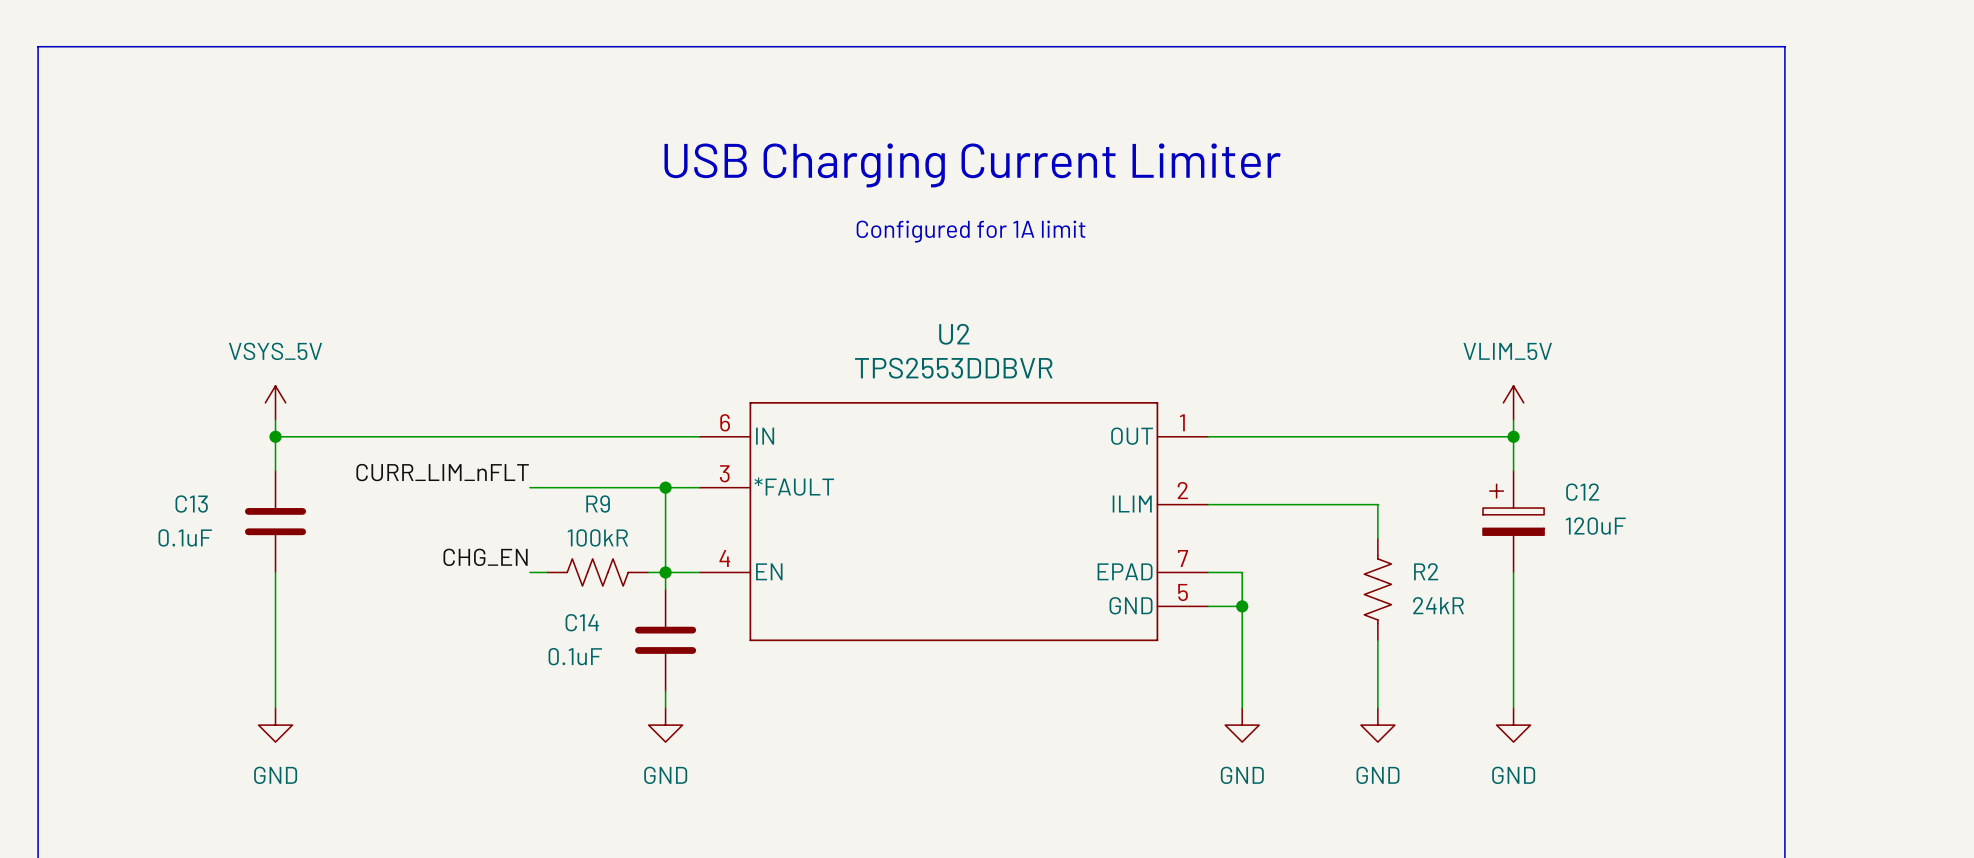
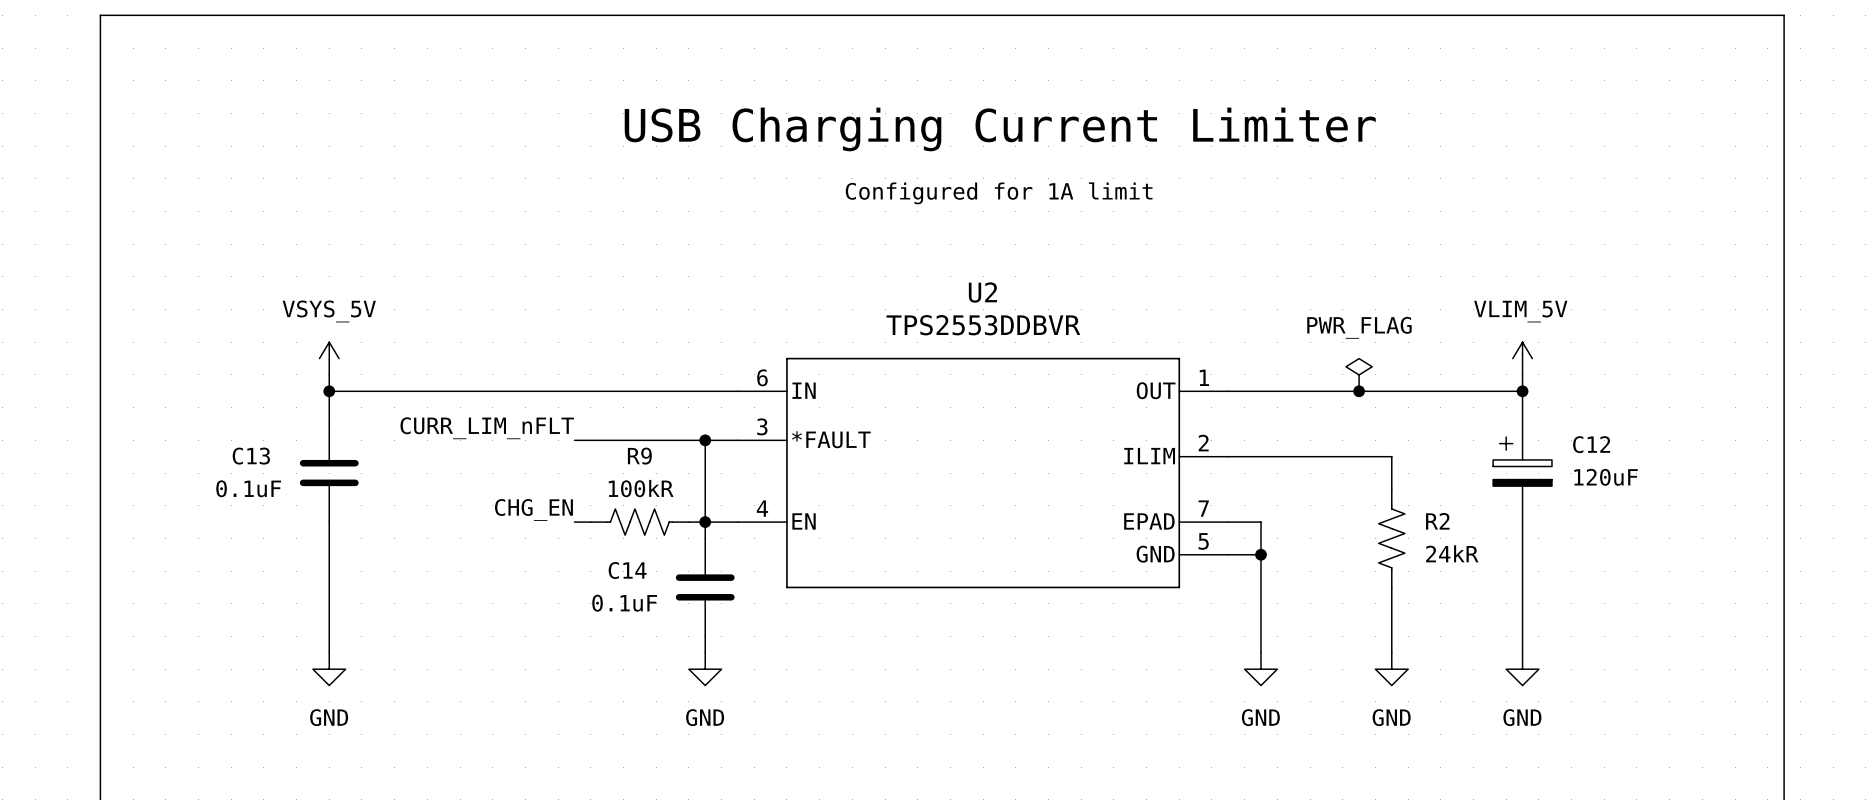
power symbol: none -> PWR_FLAG (1359, 374)
junction: none -> (1359, 391)

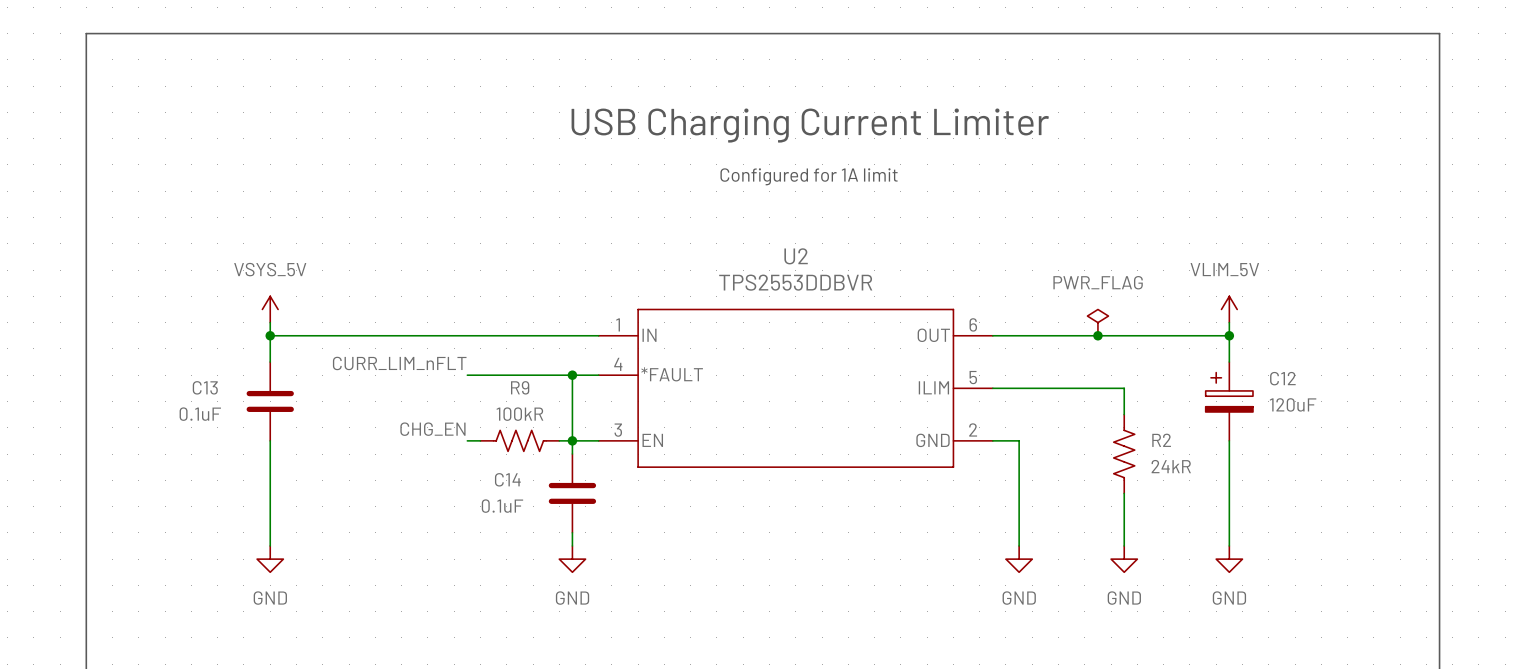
U2 symbol: [737, 357, 1229, 589] -> [598, 308, 993, 468]
wire: (1228, 554) (1261, 554) -> none
junction: (1261, 554) -> none

